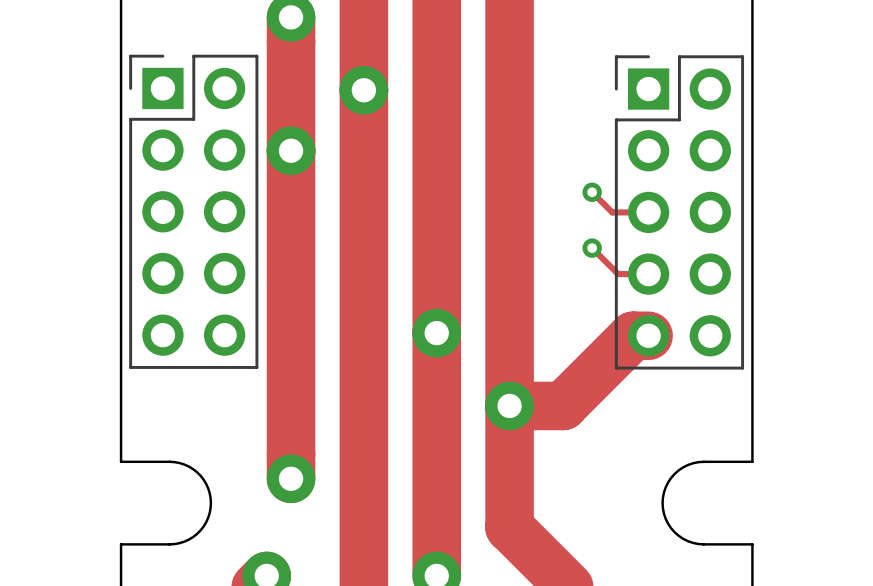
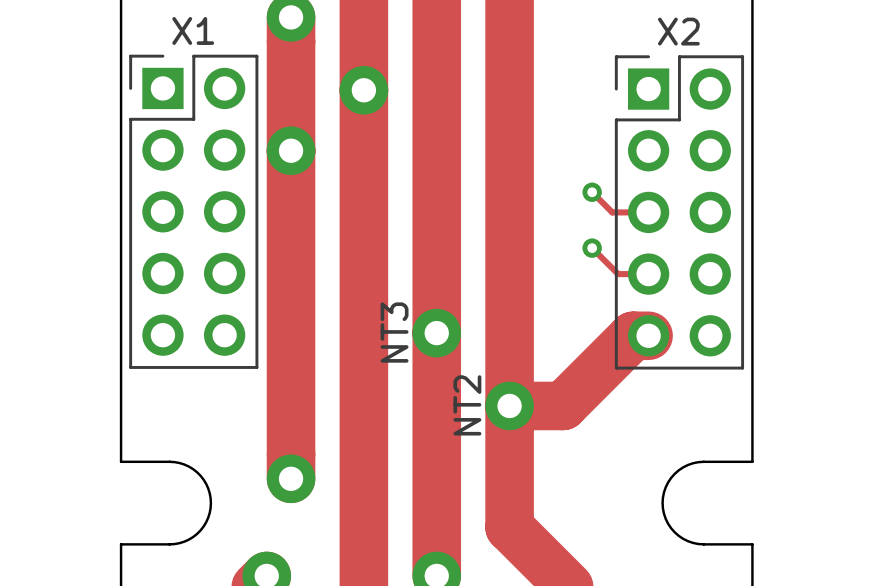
X1 name: none -> X1 (193, 30)
X2 name: none -> X2 (678, 31)
NT3 name: none -> NT3 (394, 332)
NT2 name: none -> NT2 (467, 405)

